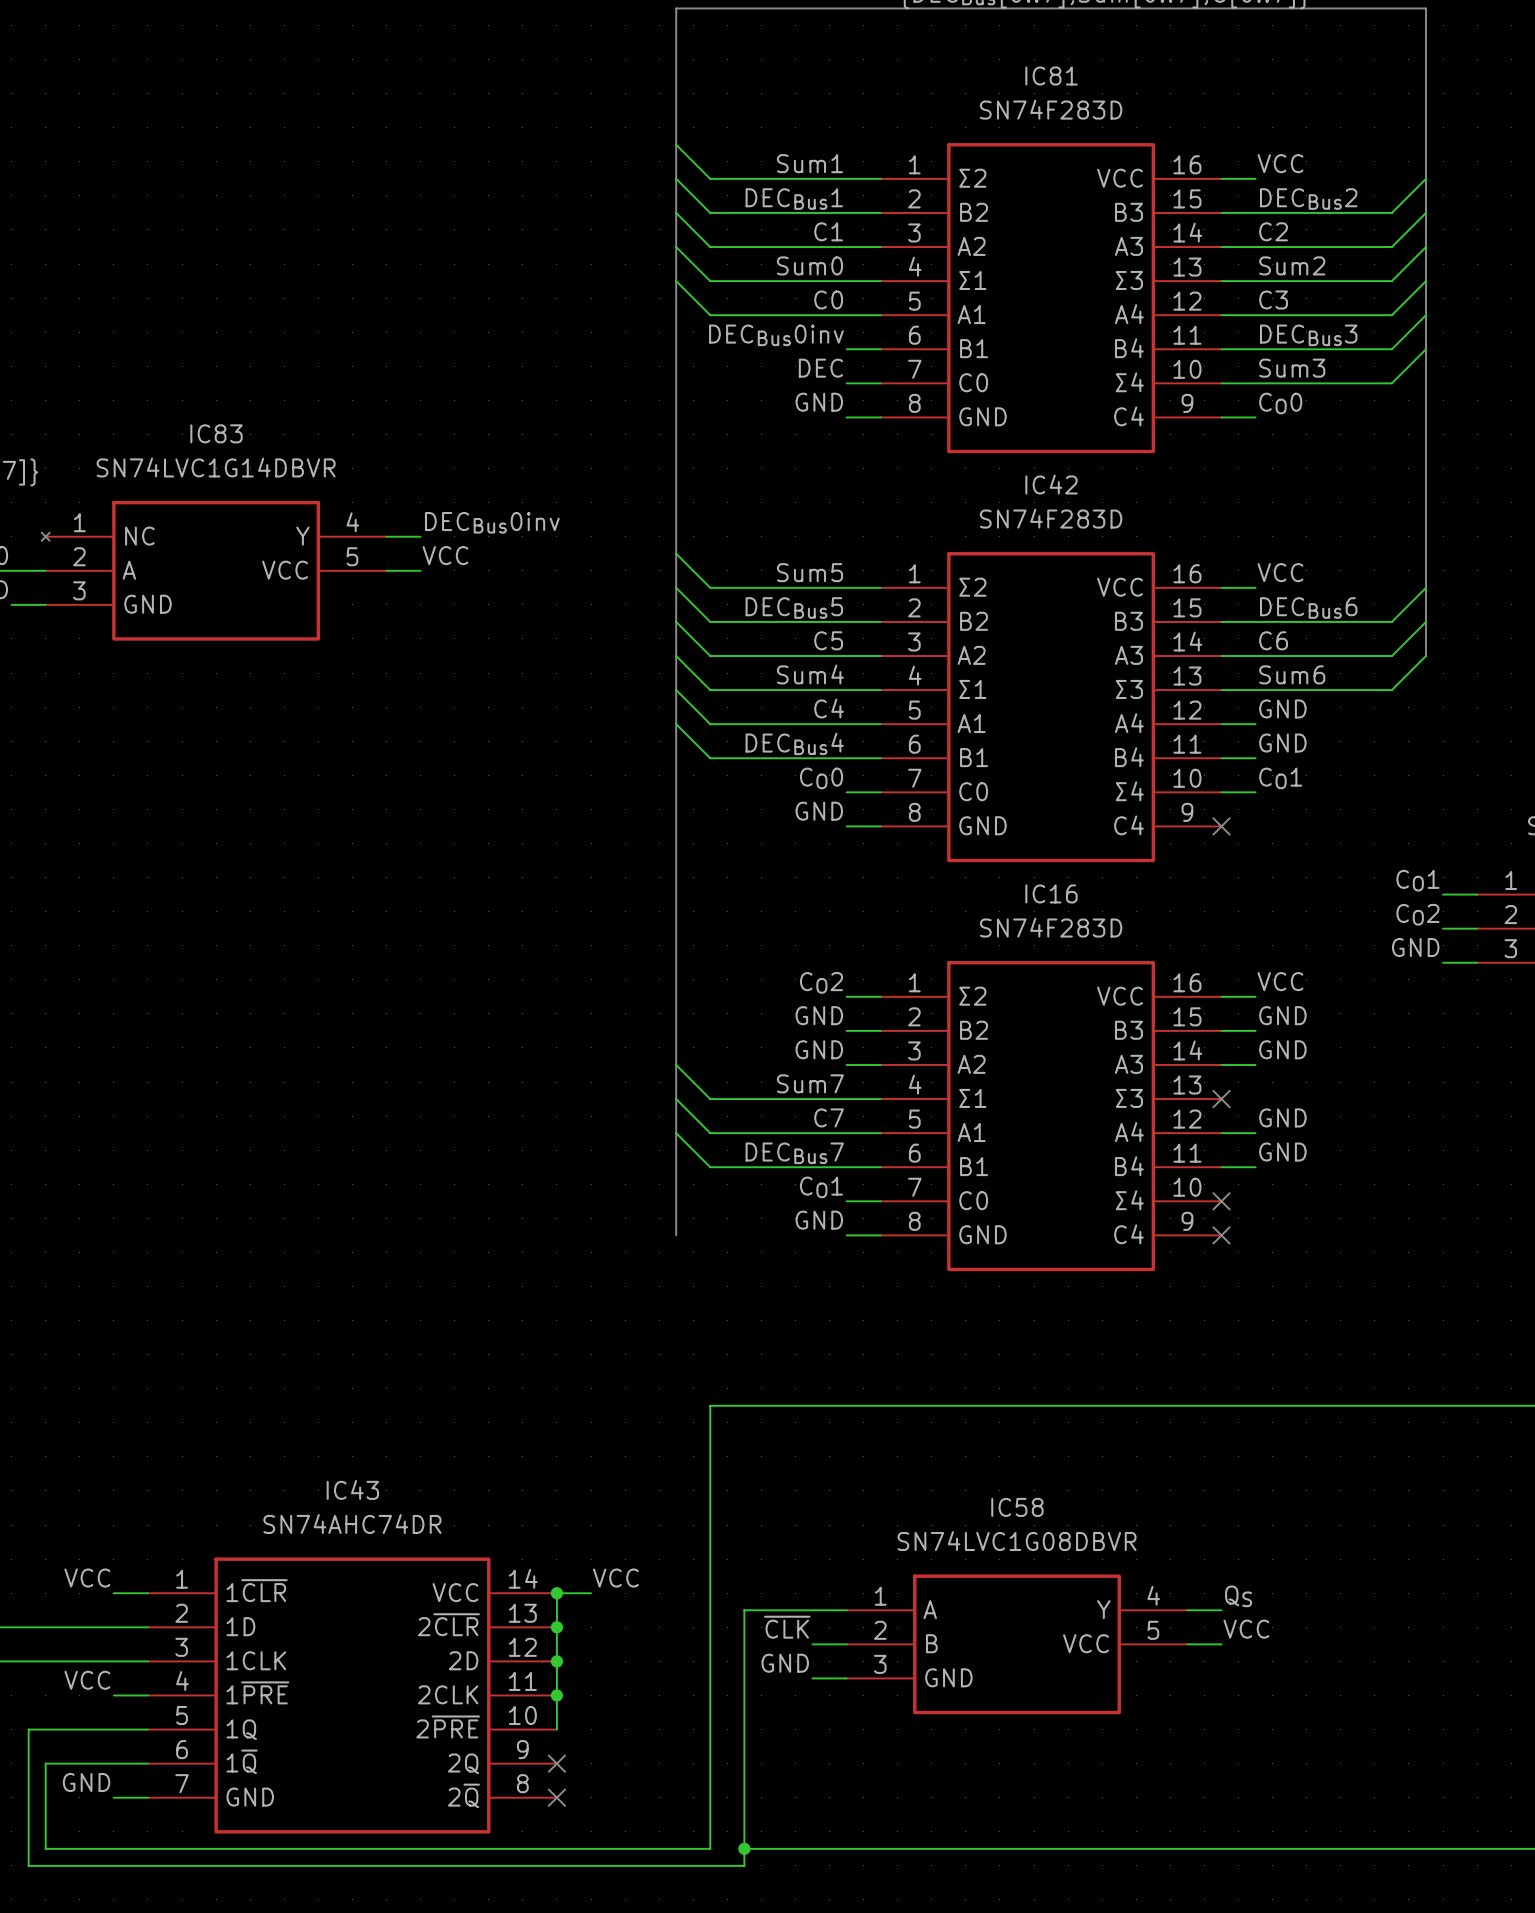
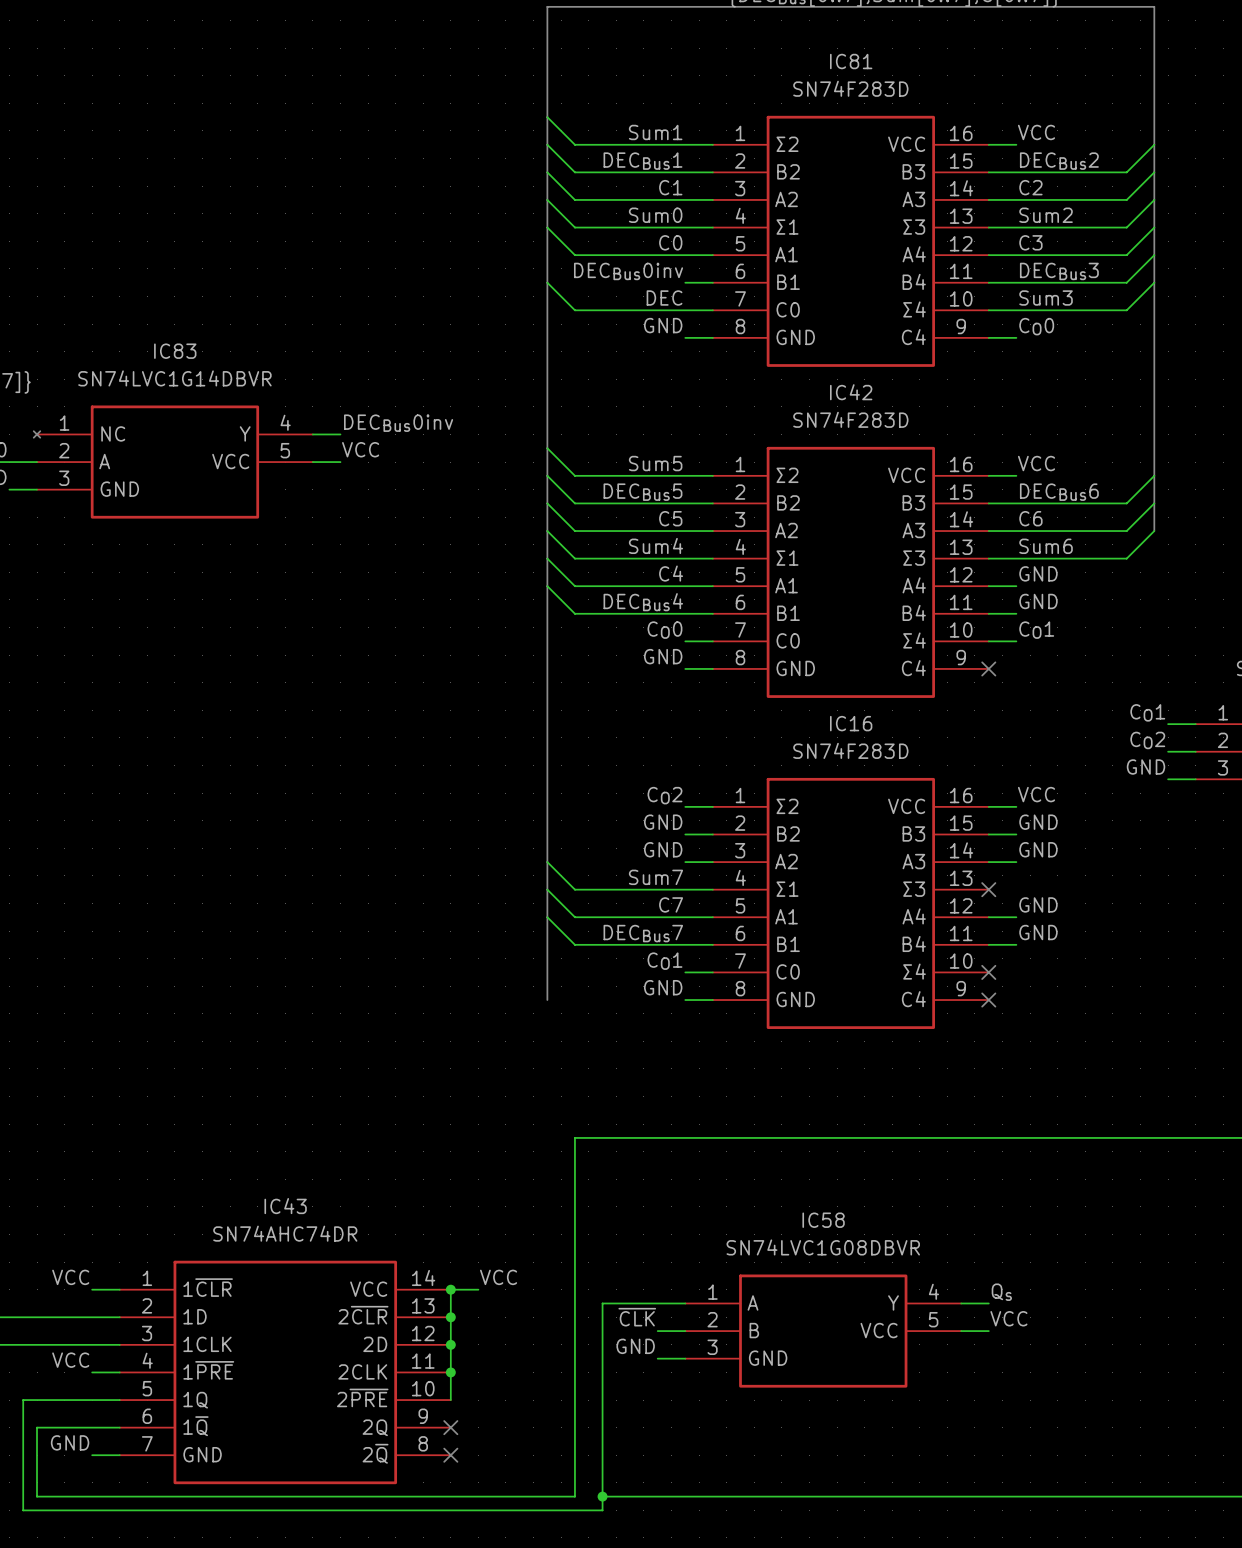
wire: none -> (547, 282) (574, 310) (685, 310)
label: QS (1238, 1596) -> Qs (1001, 1292)

